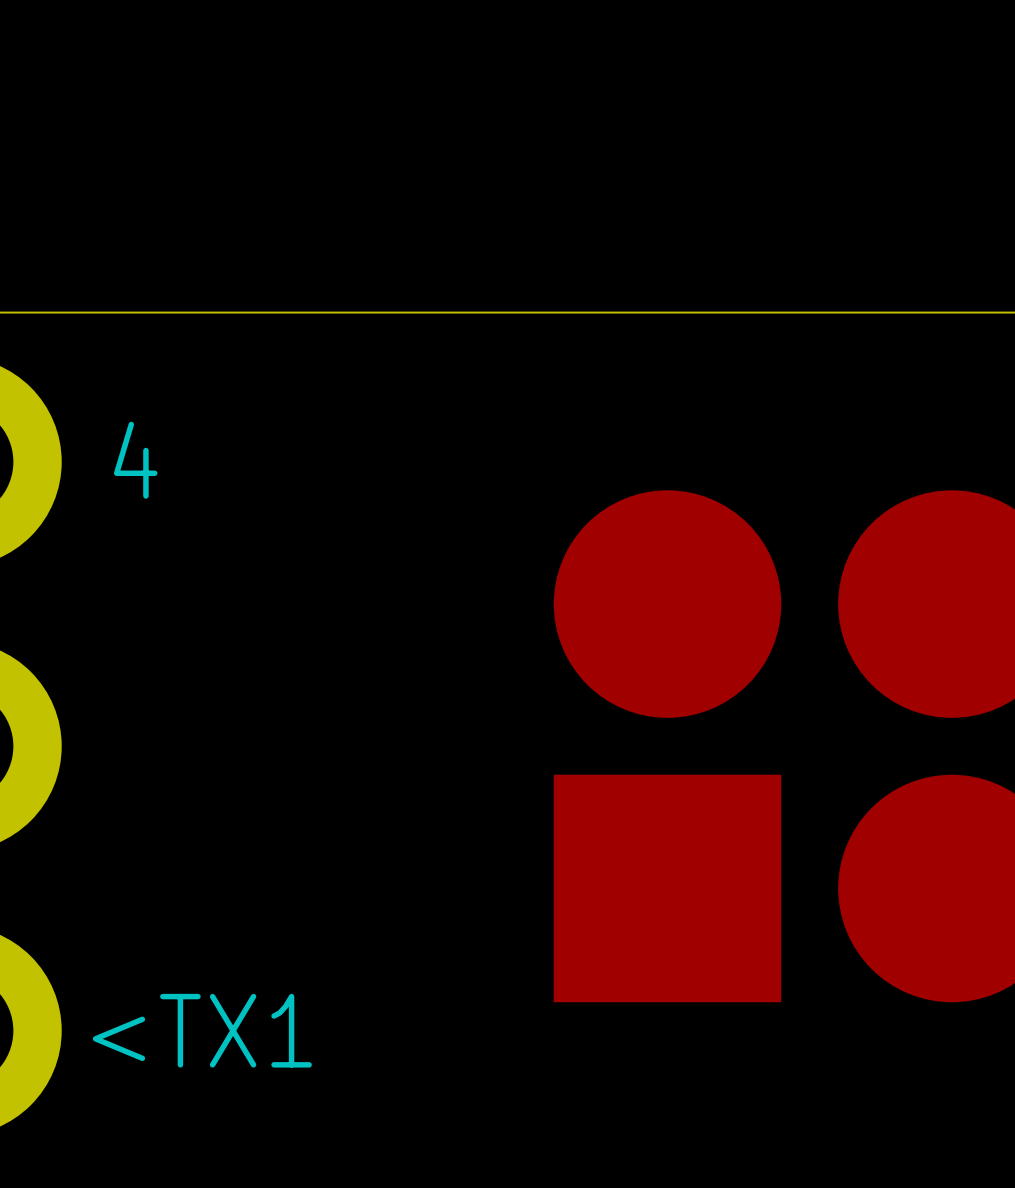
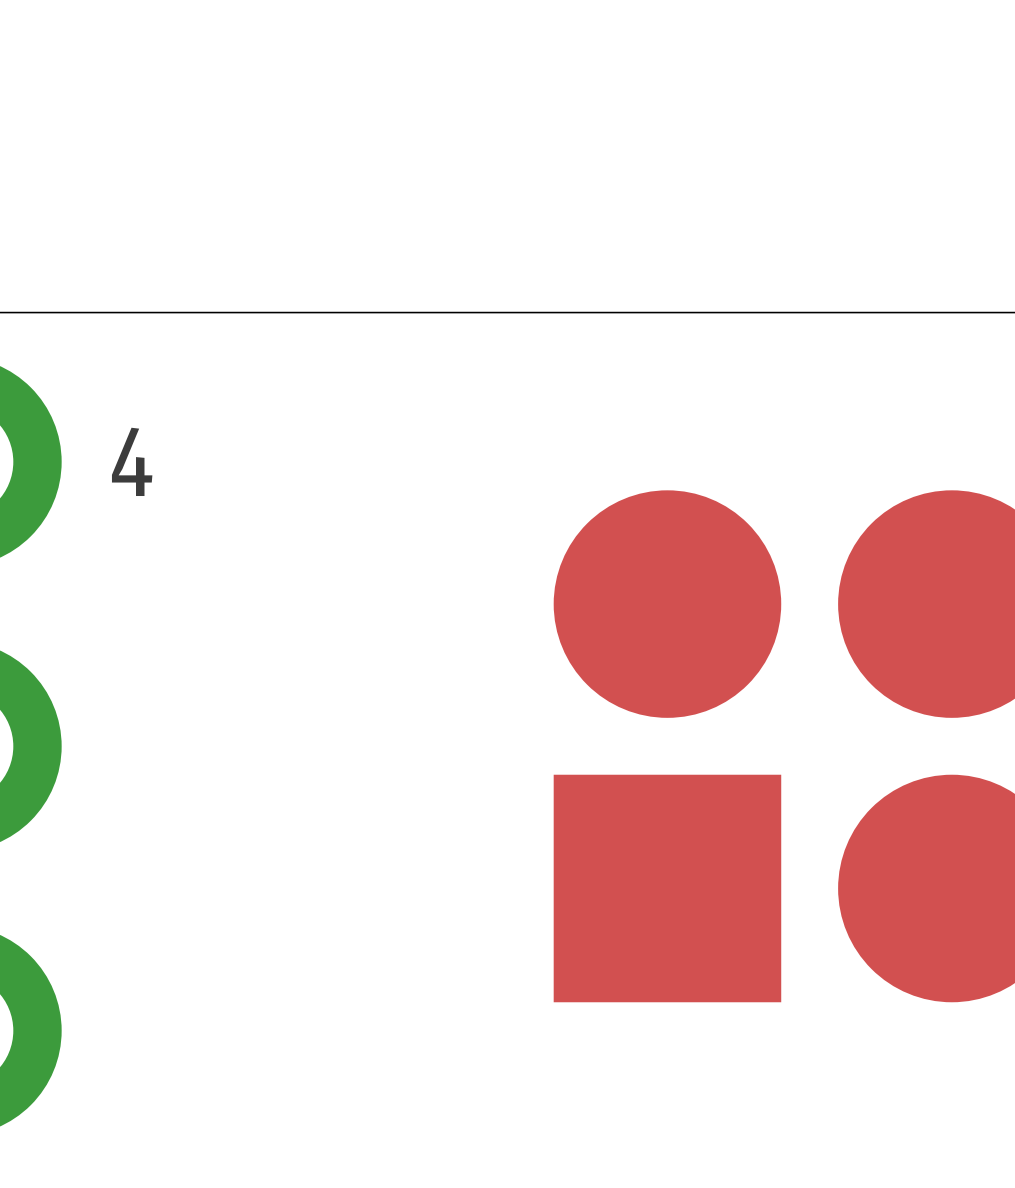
text: <TX1 (202, 1030) -> none

